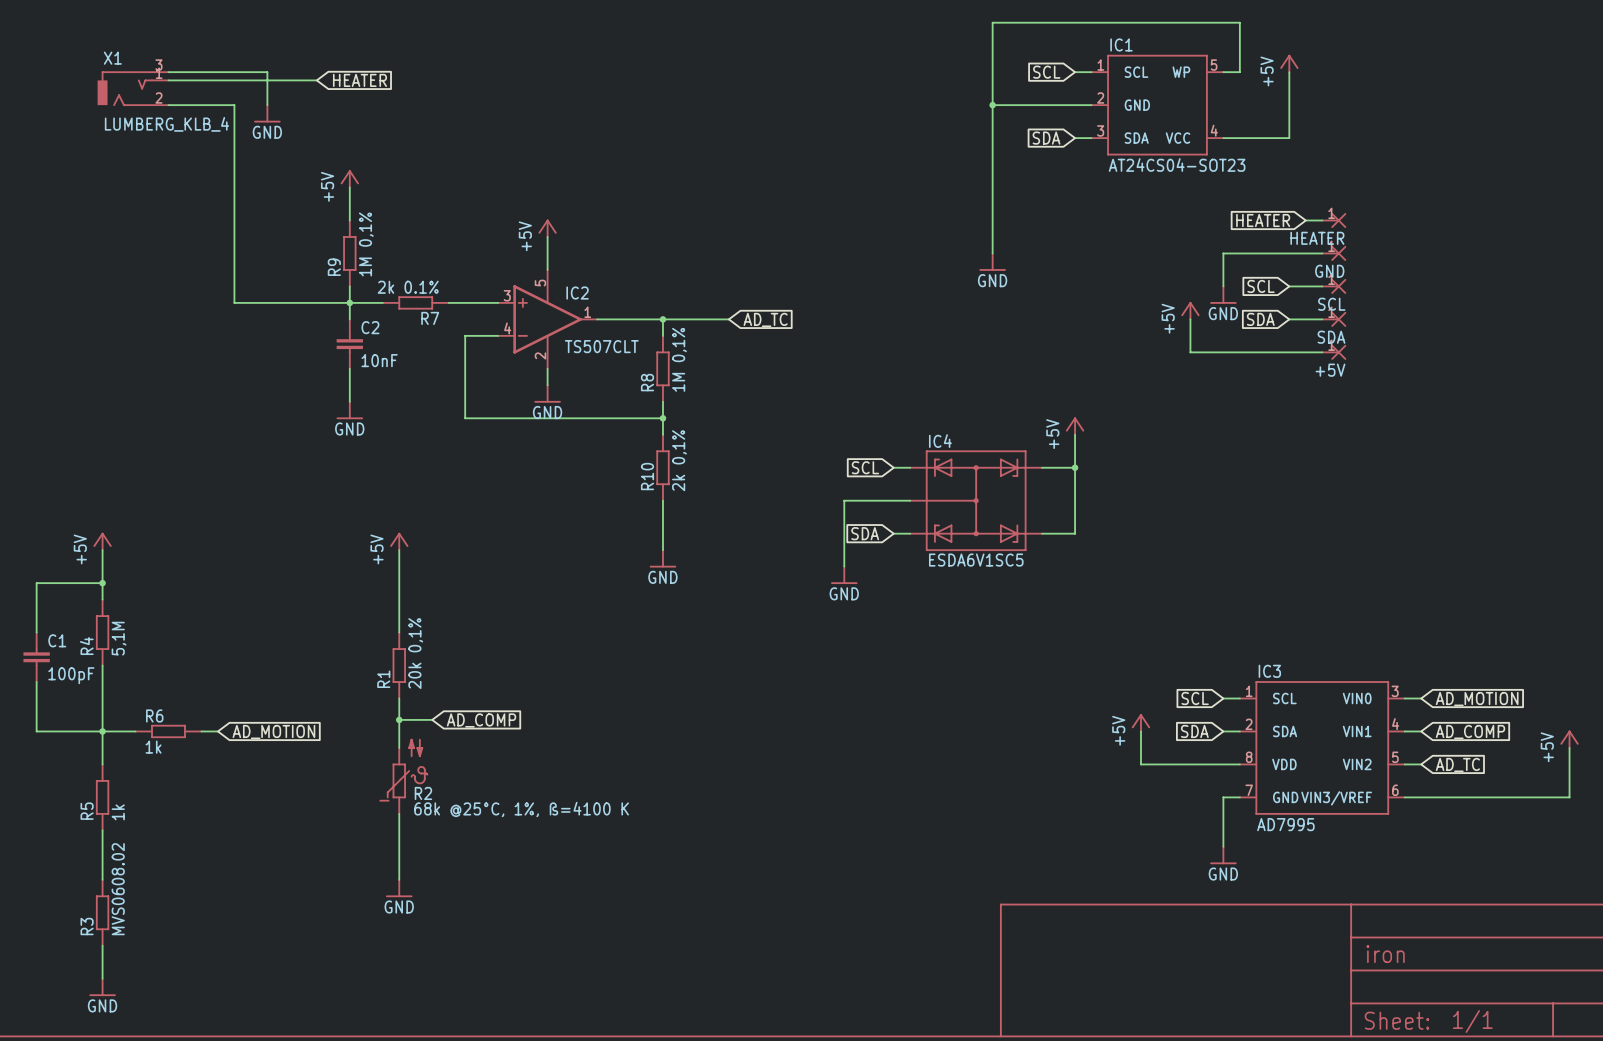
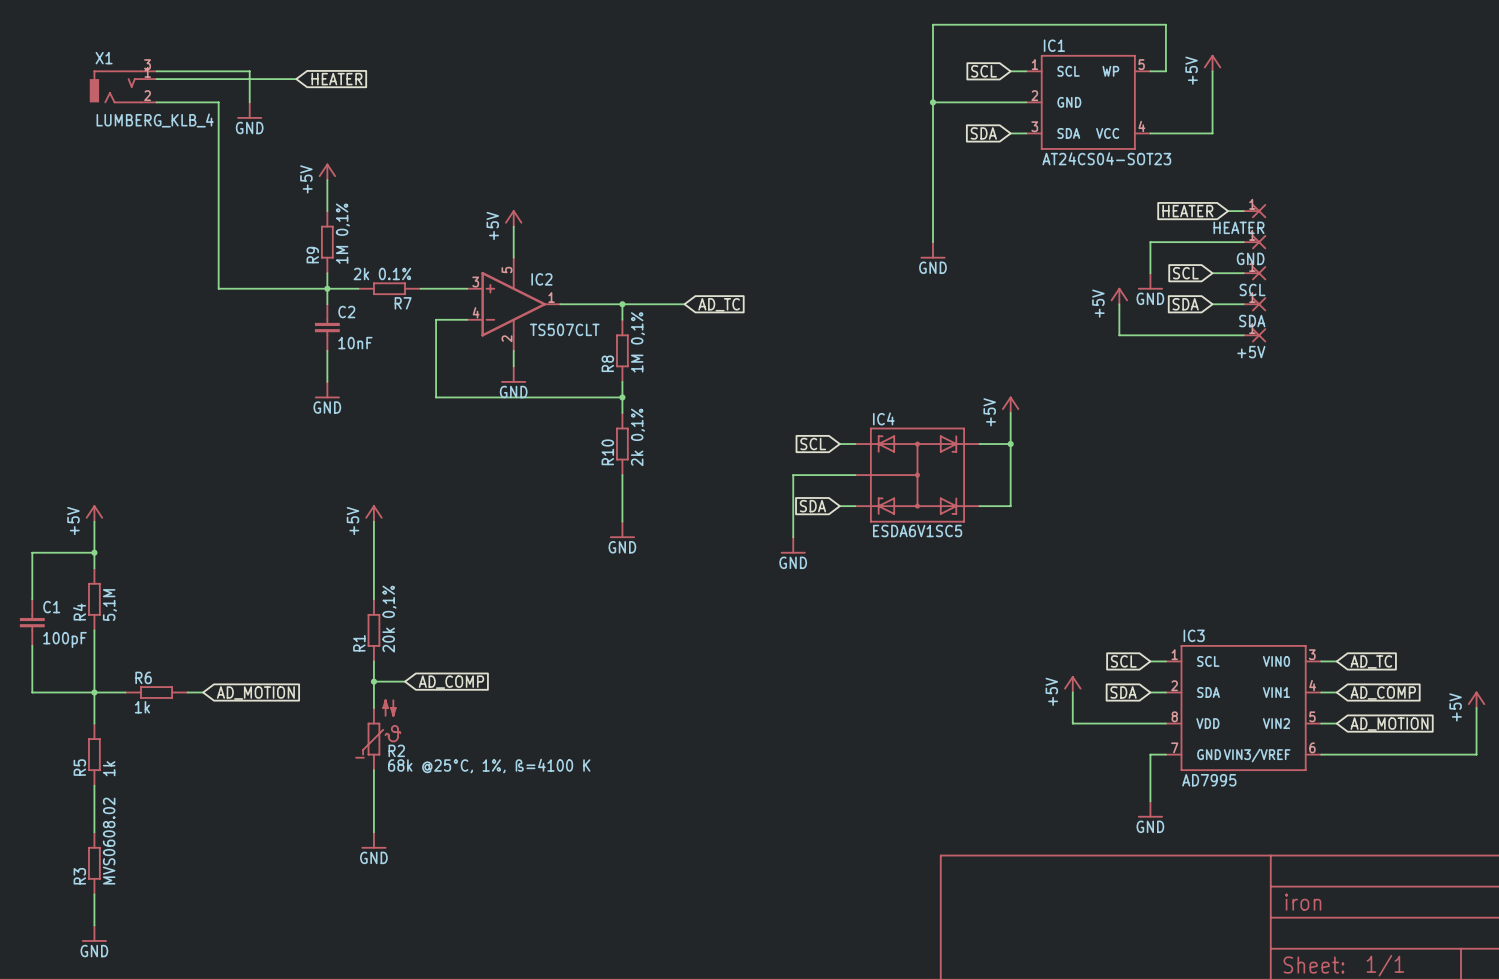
global label: AD_MOTION (1477, 699) -> AD_TC (1371, 661)
global label: AD_TC (1457, 764) -> AD_MOTION (1389, 724)

